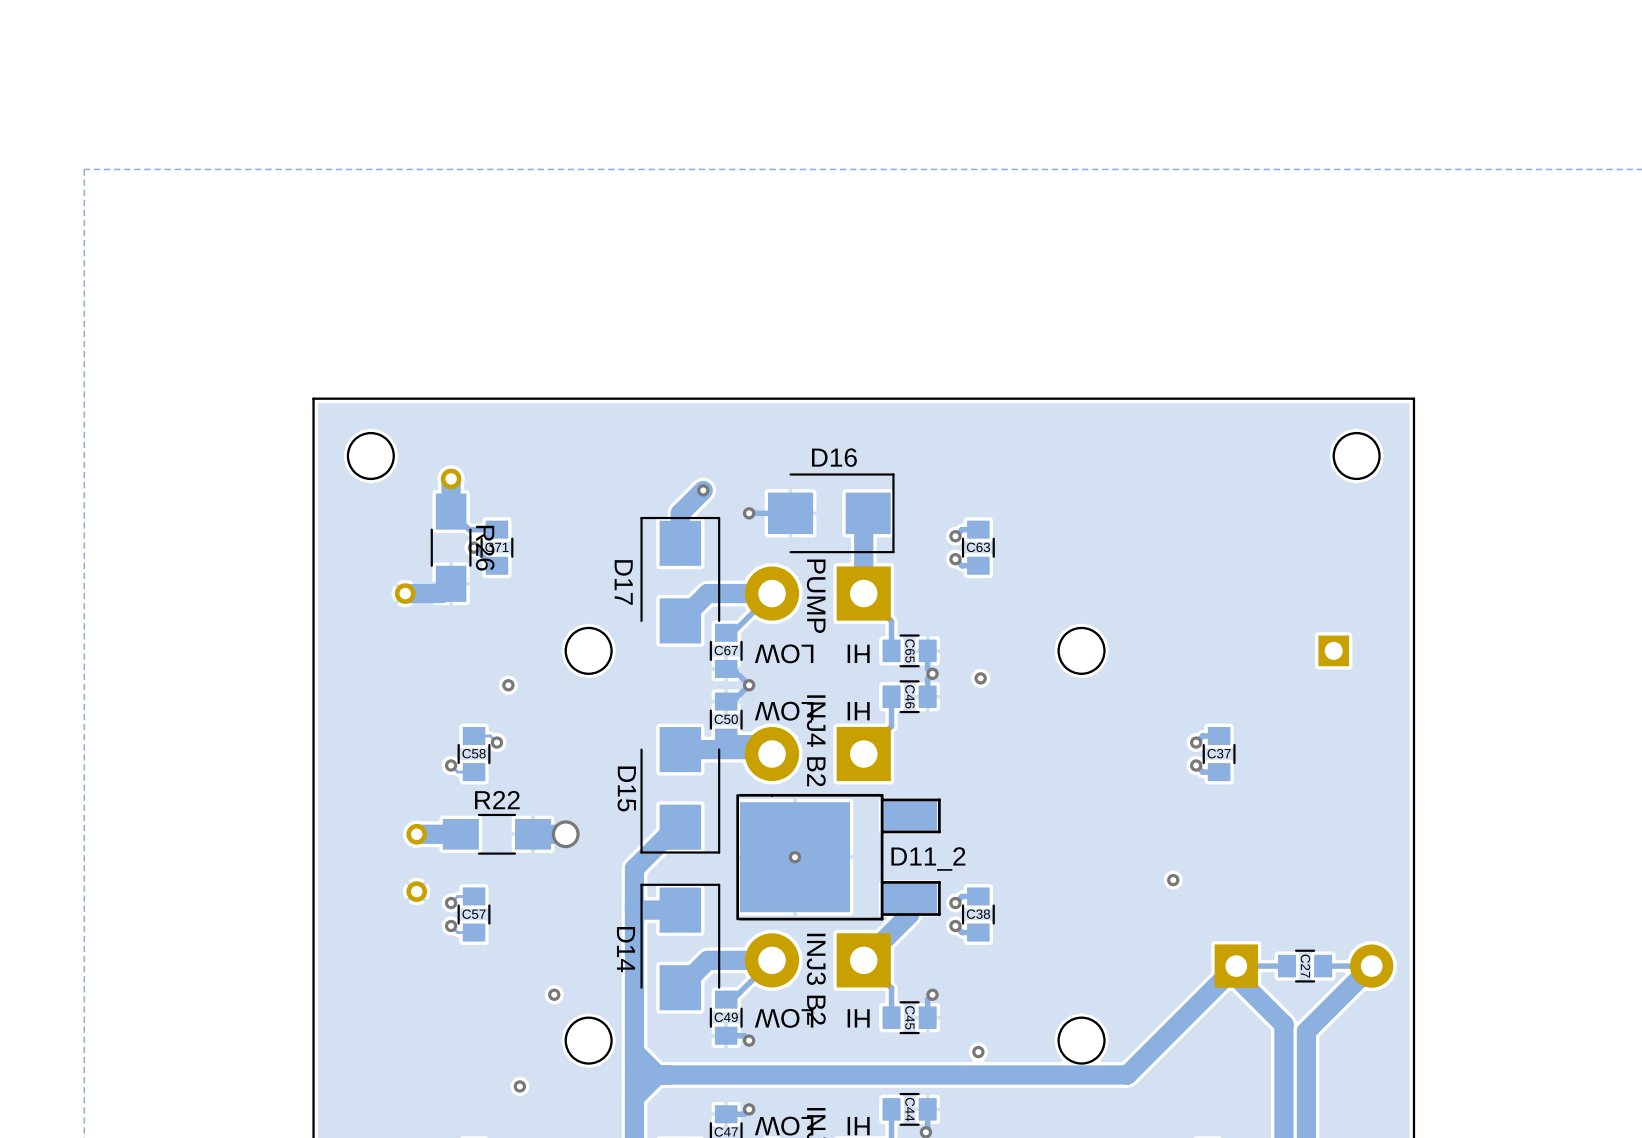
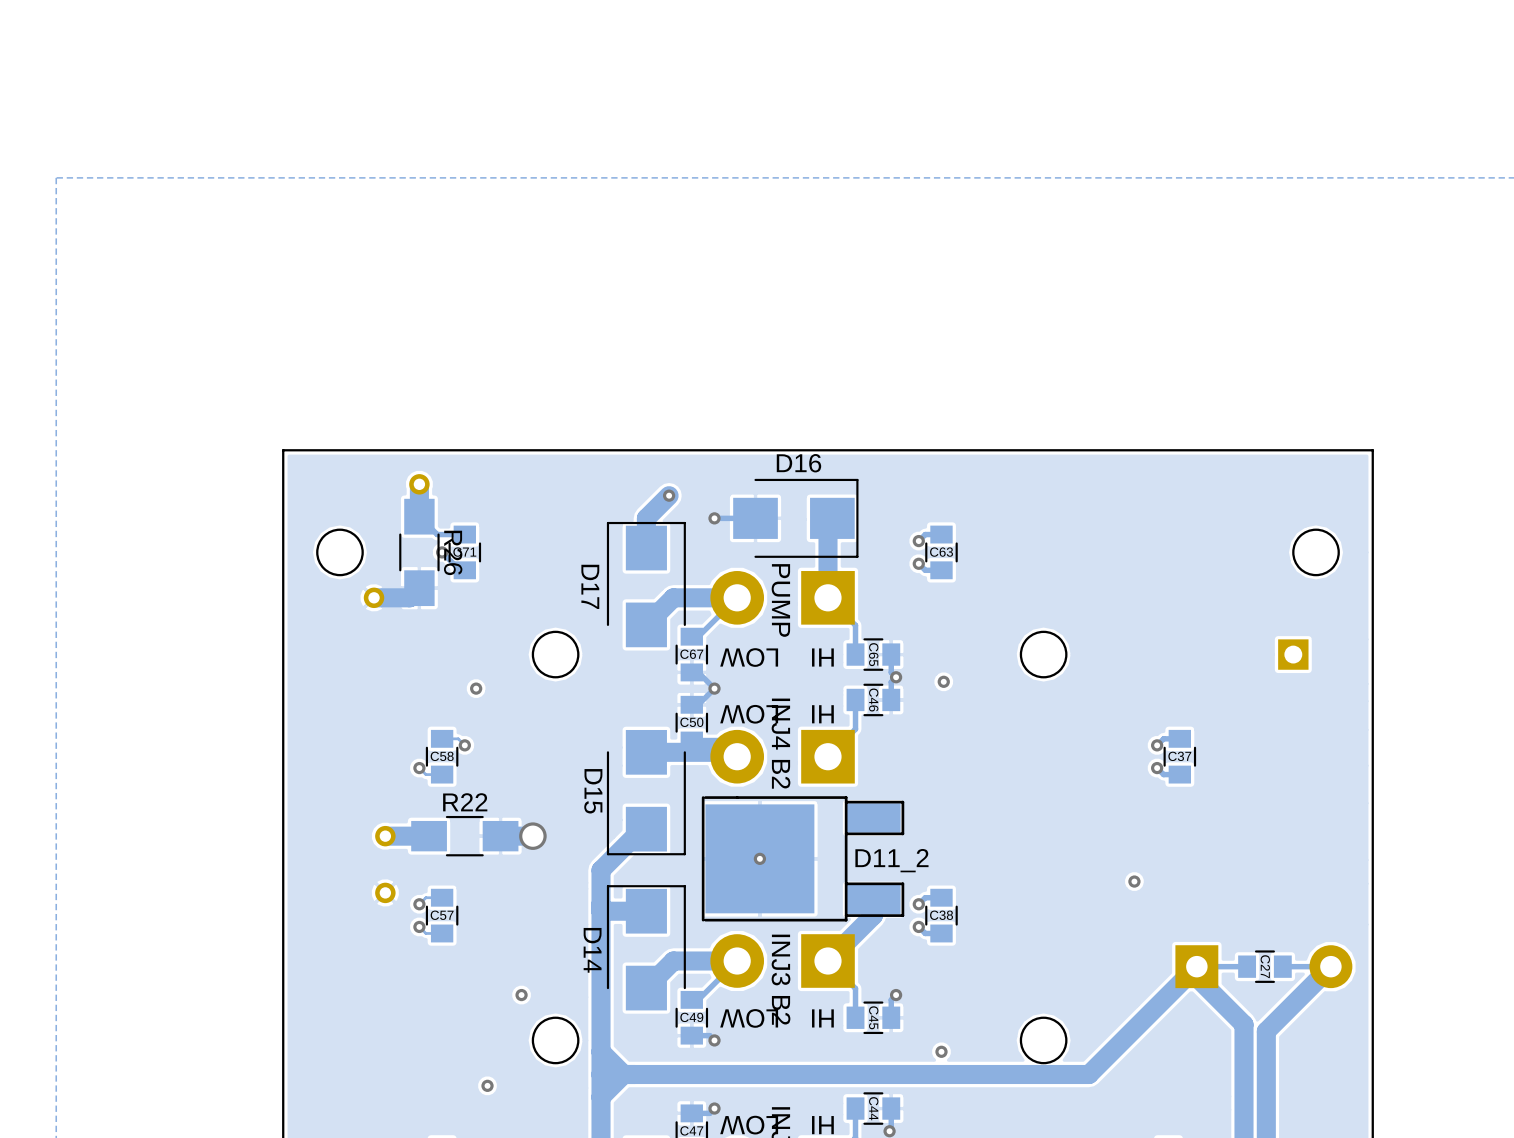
board edge: (1413, 444) (1413, 398) (313, 398) (313, 444) -> (1372, 450) (283, 450)
round board edge position: (370, 456) -> (339, 552)
round board edge position: (1356, 456) -> (1316, 552)

